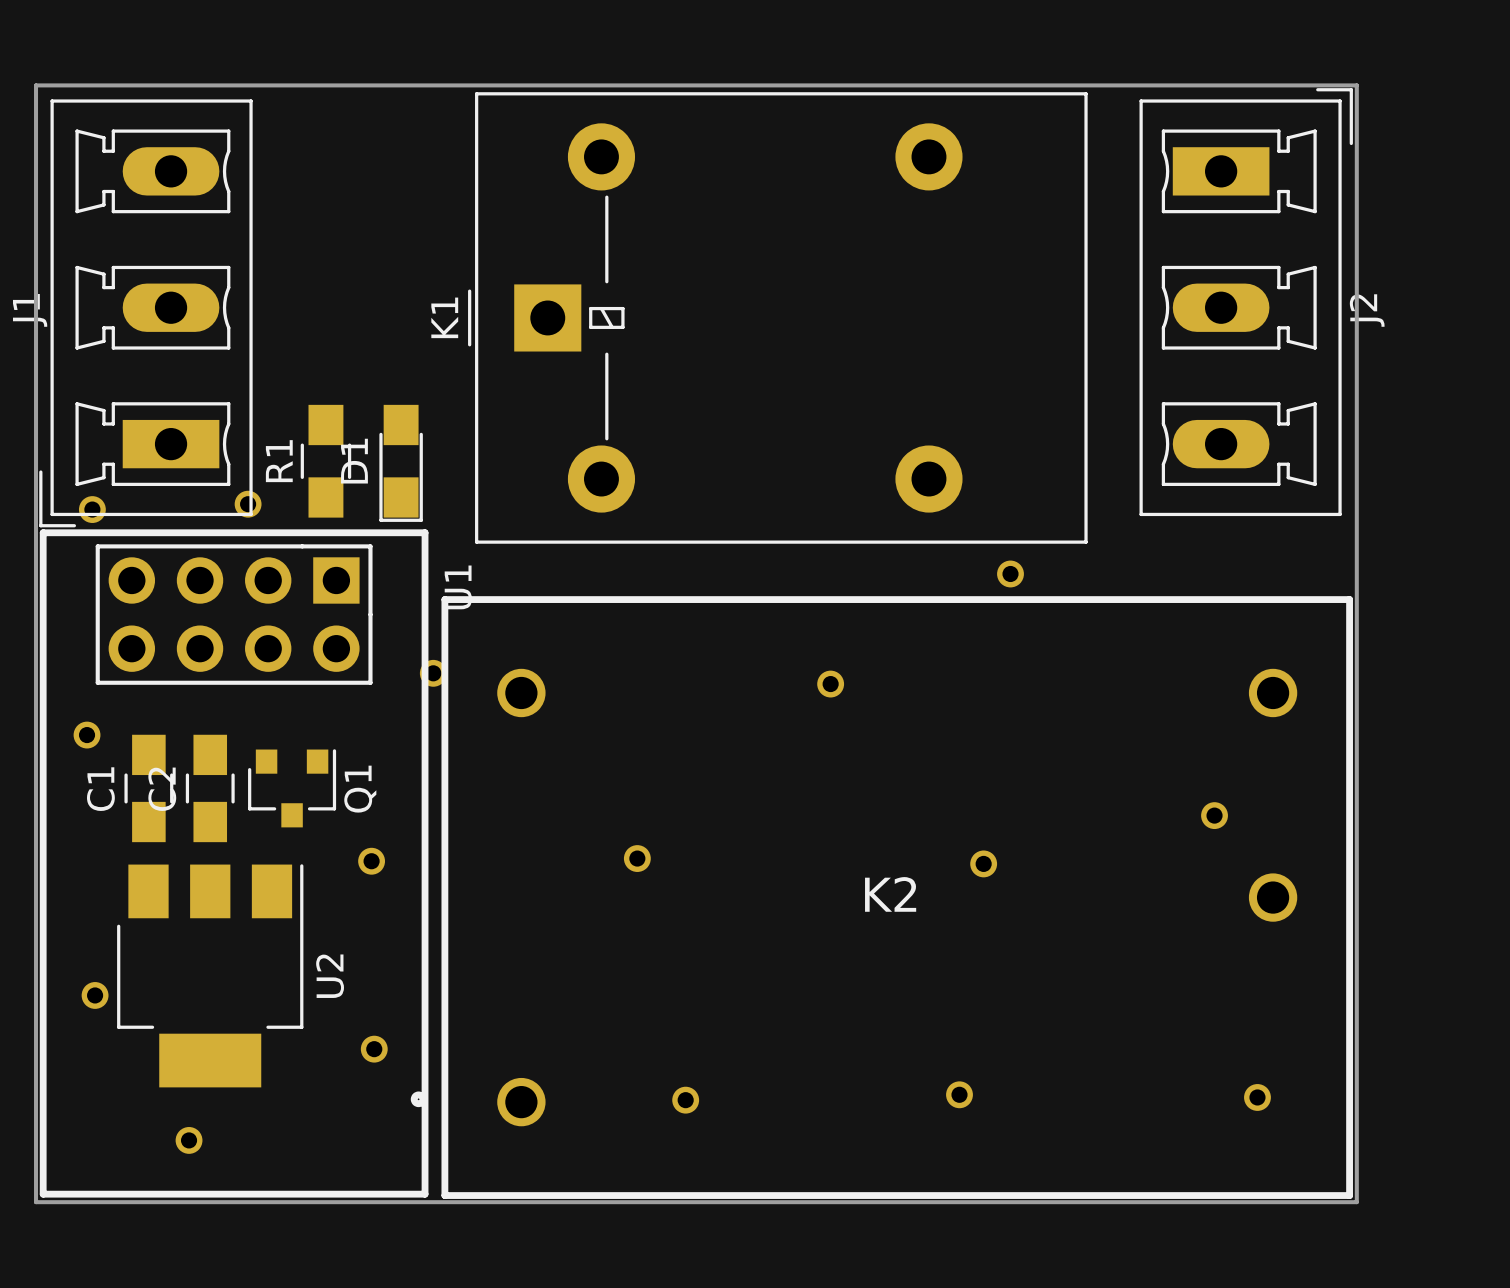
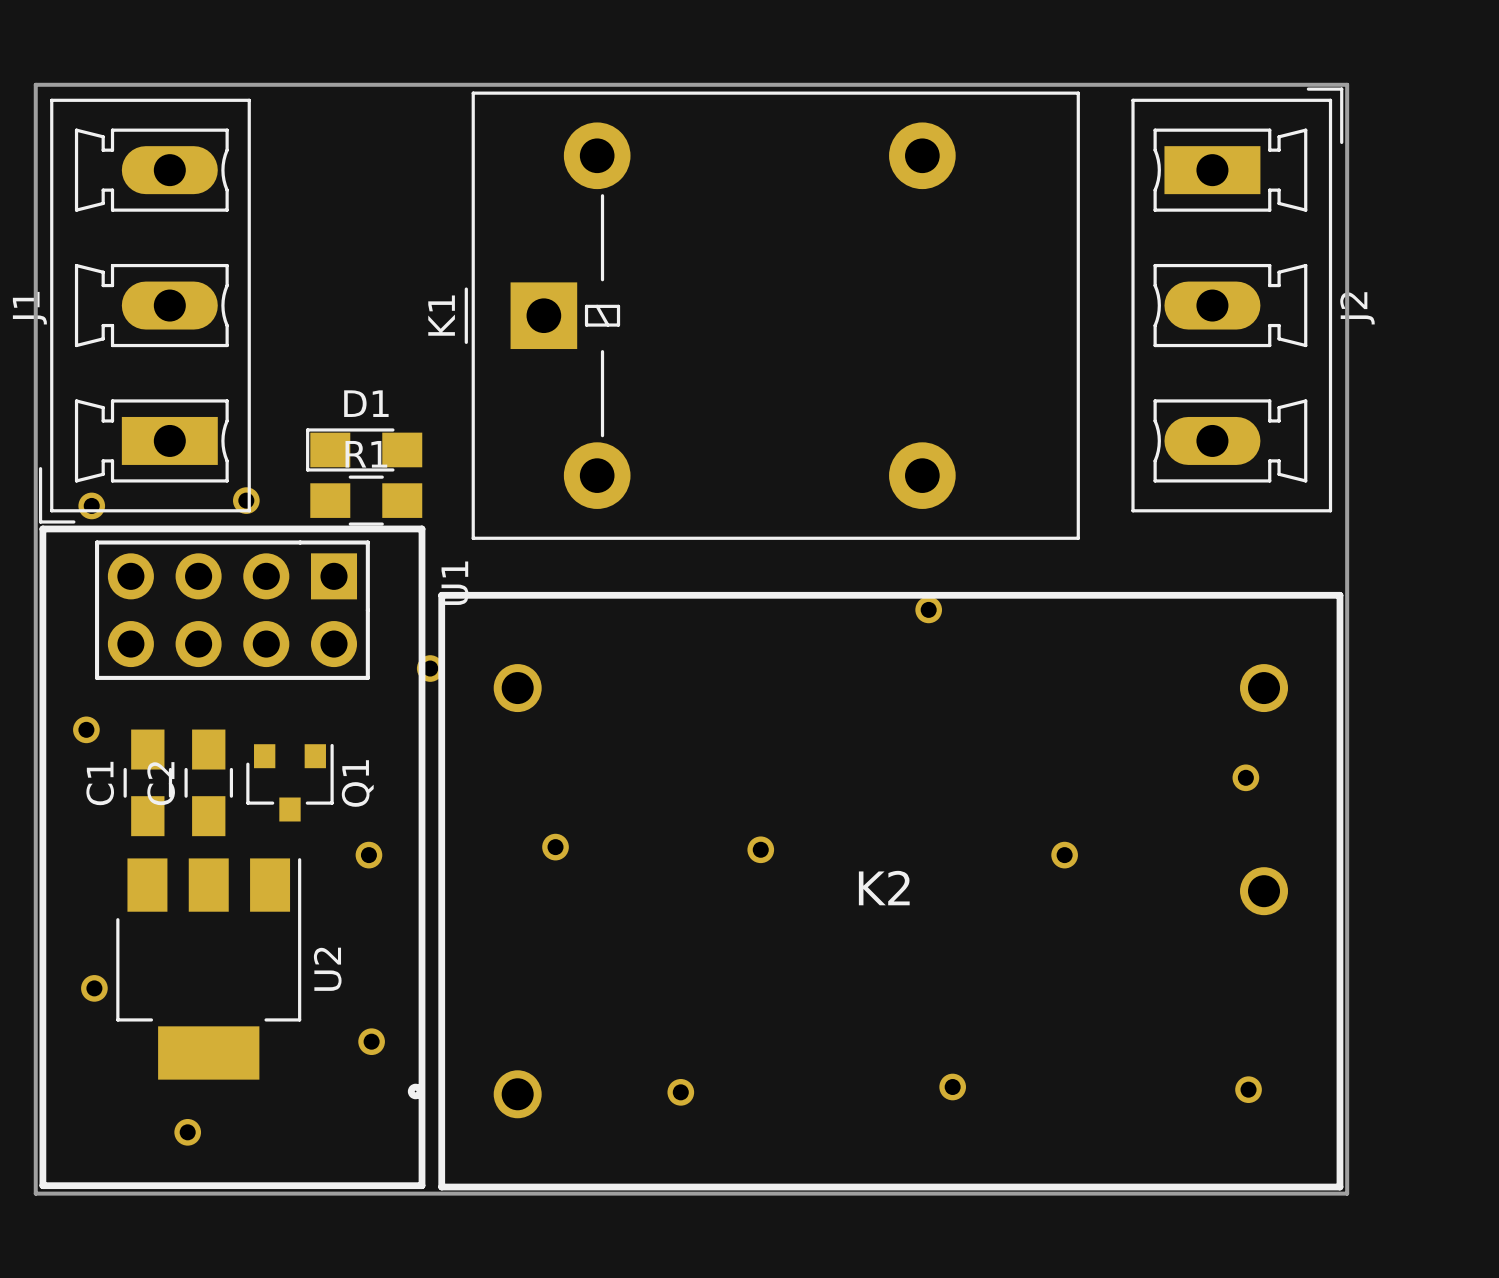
R1 rotation: 0° (325, 461) -> 90° clockwise (366, 500)
D1 rotation: 0° (401, 463) -> 90° clockwise (364, 449)
part: (1010, 573) -> none
part: none -> (928, 609)
part: (830, 684) -> none
part position: (1214, 815) -> (1245, 777)
part: none -> (555, 847)
part: none -> (760, 849)
part: (637, 858) -> none
part: none -> (1064, 855)
part: (983, 863) -> none

